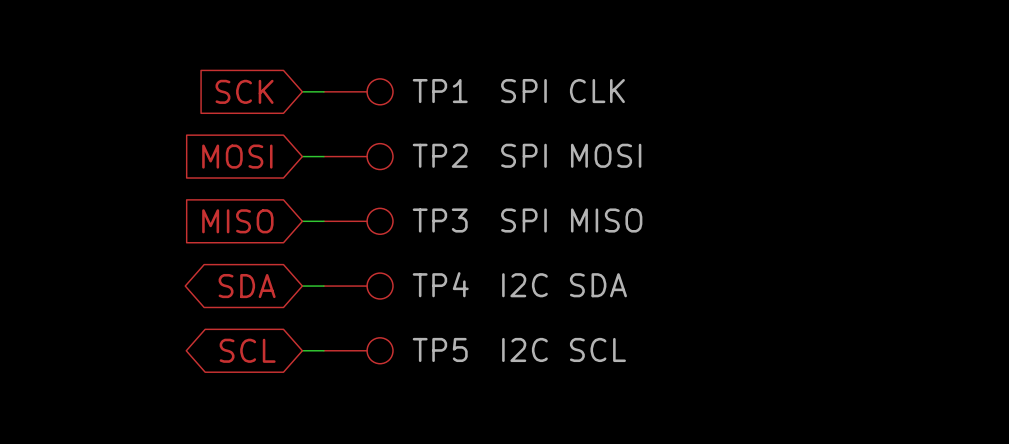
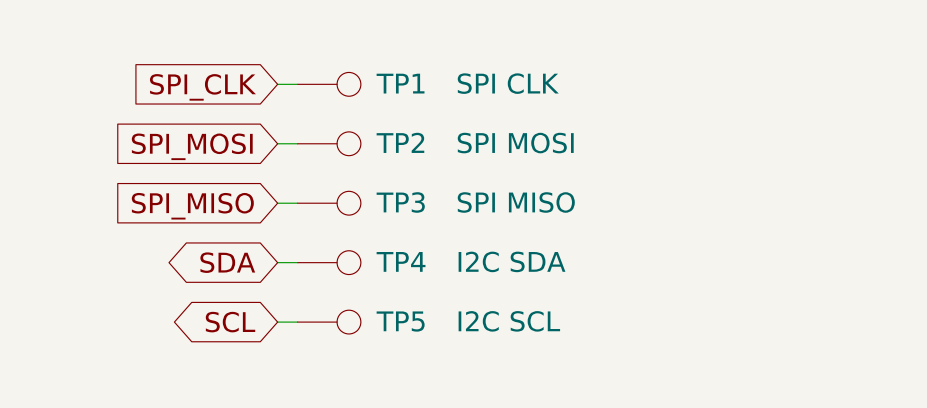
global label: SCK (244, 91) -> SPI_CLK (202, 87)
global label: MOSI (237, 156) -> SPI_MOSI (192, 146)
global label: MISO (237, 221) -> SPI_MISO (192, 206)

